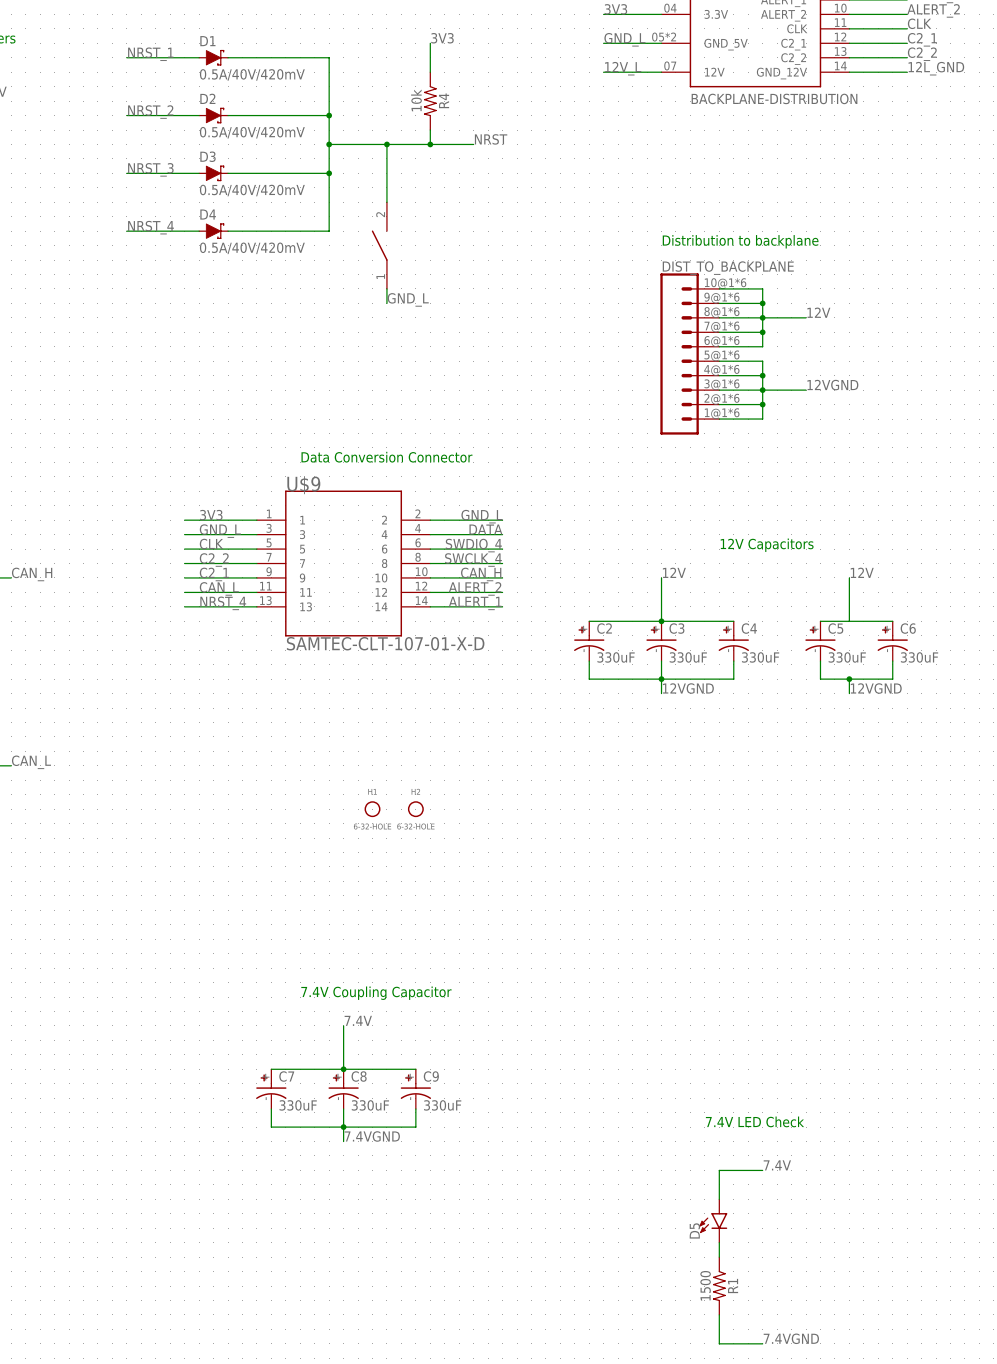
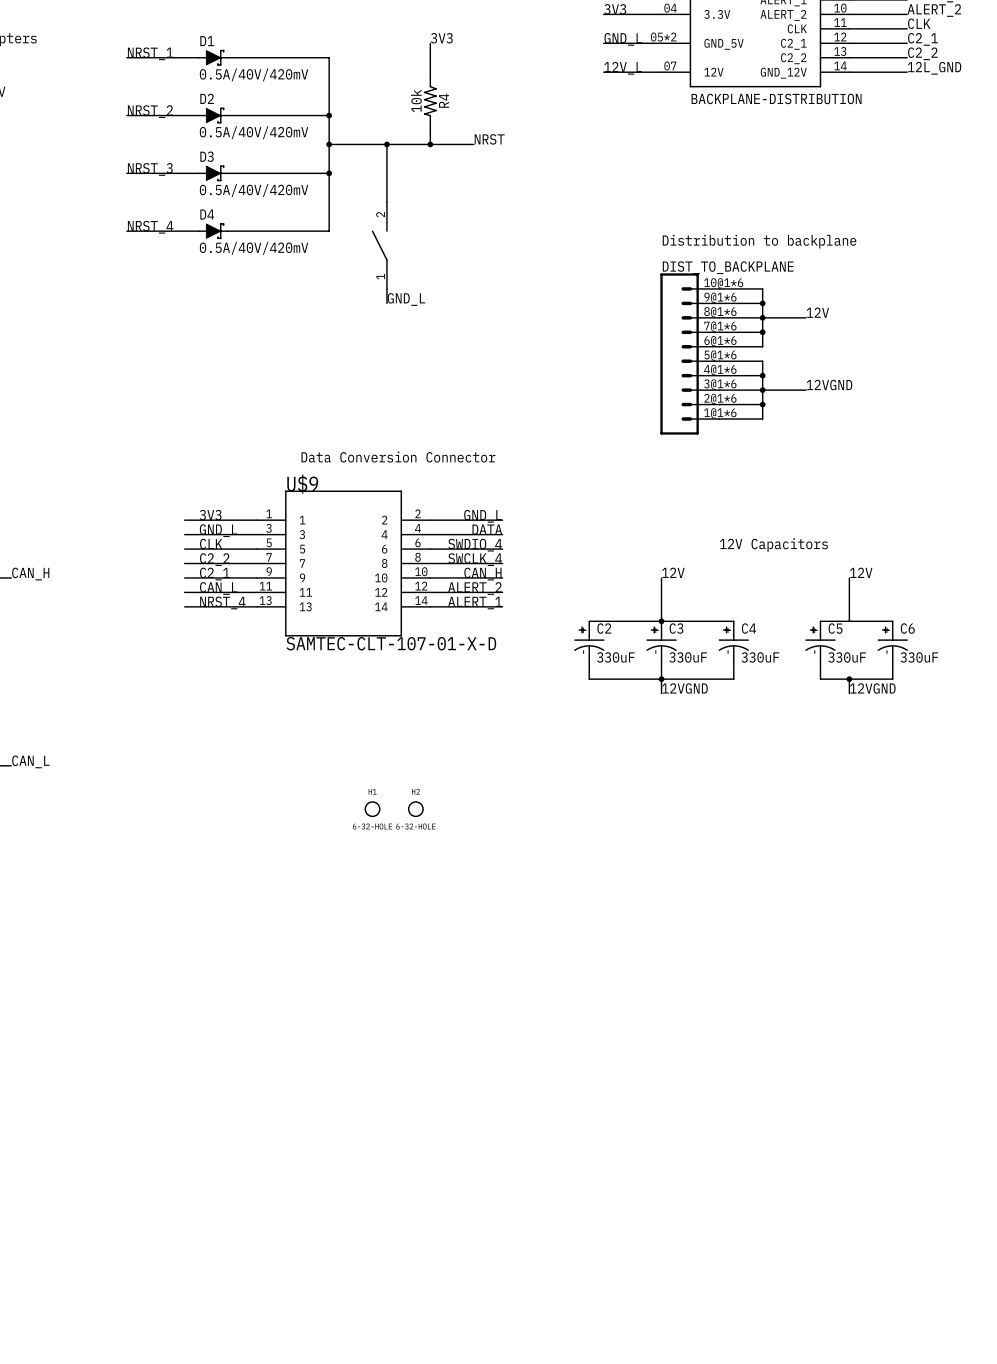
text: 7.4V Coupling Capacitor (376, 993) -> none
label: 7.4V (358, 1020) -> none
wire: (343, 1025) (343, 1069) -> none
wire: (271, 1069) (415, 1069) -> none
junction: (343, 1069) -> none
C7: 330uF (271, 1089) -> none
C8: 330uF (343, 1089) -> none
C9: 330uF (415, 1089) -> none
wire: (271, 1109) (271, 1127) (415, 1127) (415, 1109) -> none
wire: (343, 1109) (343, 1141) -> none
text: 7.4V LED Check (754, 1121) -> none
junction: (343, 1127) -> none
label: 7.4VGND (372, 1136) -> none
label: 7.4V (777, 1165) -> none
wire: (762, 1170) (719, 1170) (719, 1199) -> none
D5: (713, 1221) -> none
wire: (719, 1242) (719, 1257) -> none
R1: 1500 (719, 1286) -> none
wire: (719, 1314) (719, 1343) (762, 1343) -> none
label: 7.4VGND (791, 1338) -> none

